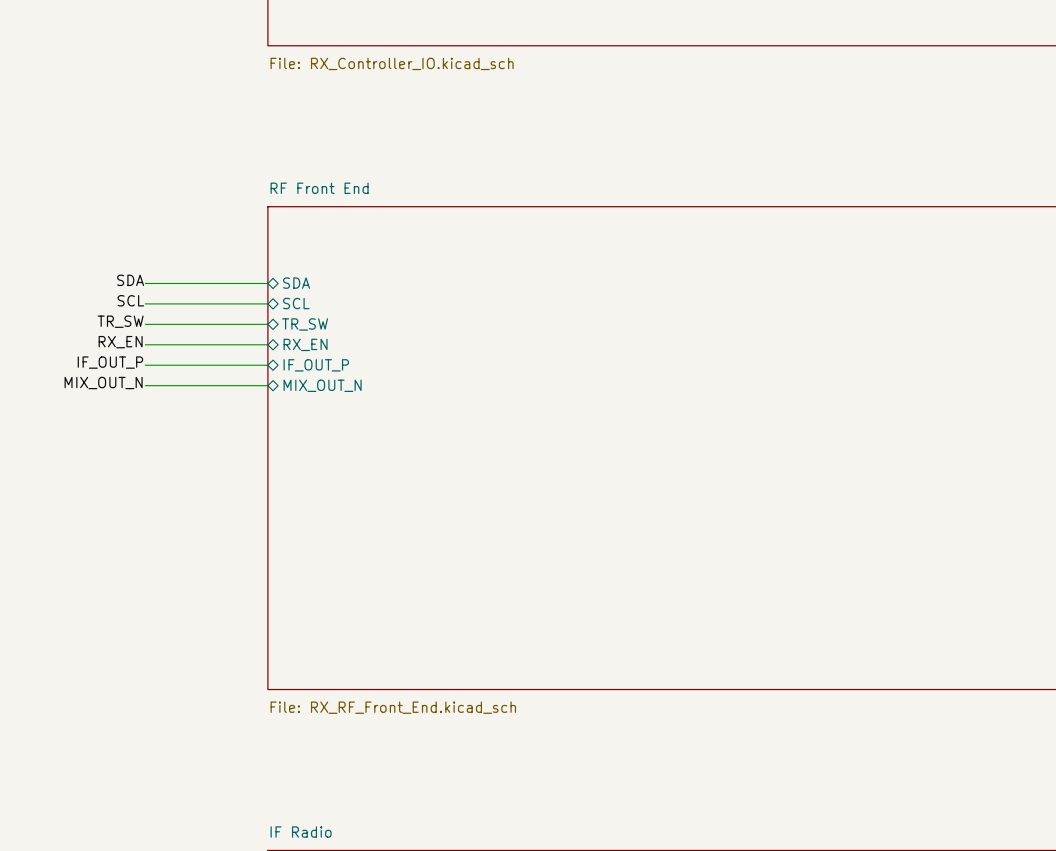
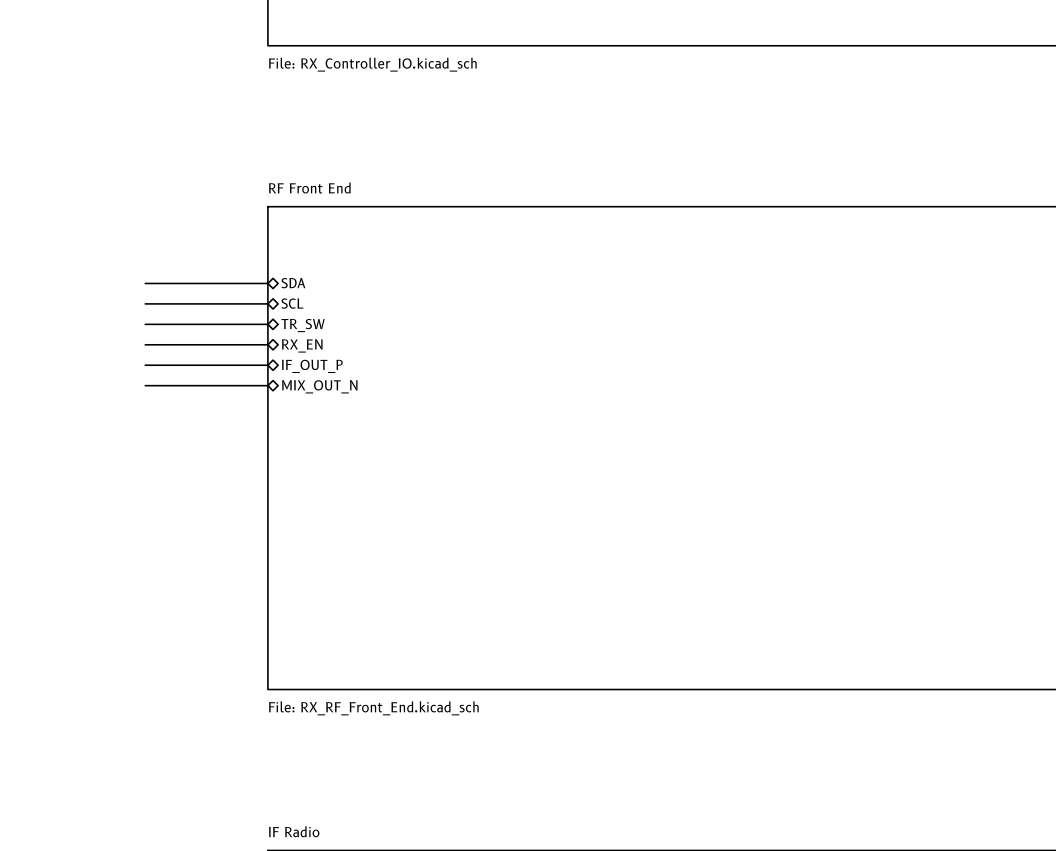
label: SDA (130, 280) -> none
label: SCL (130, 300) -> none
label: TR_SW (120, 321) -> none
label: RX_EN (120, 342) -> none
label: IF_OUT_P (110, 362) -> none
label: MIX_OUT_N (103, 383) -> none

